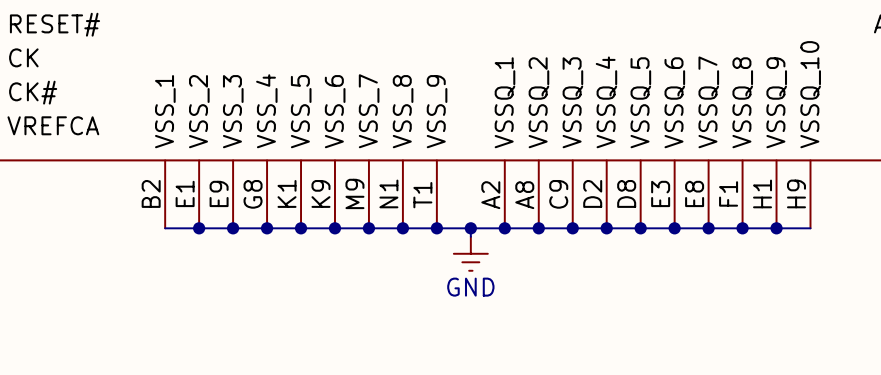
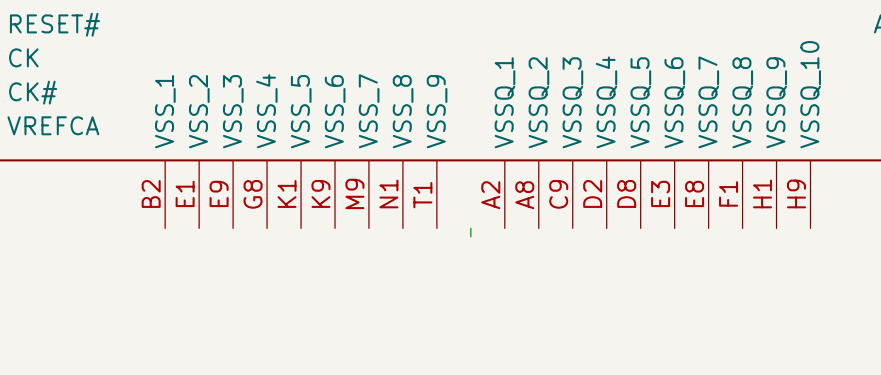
wire: (165, 228) (810, 228) -> none
junction: (199, 228) -> none
junction: (233, 228) -> none
junction: (267, 228) -> none
junction: (301, 228) -> none
junction: (334, 228) -> none
junction: (368, 228) -> none
junction: (402, 228) -> none
junction: (436, 228) -> none
junction: (470, 228) -> none
junction: (504, 228) -> none
junction: (538, 228) -> none
junction: (572, 228) -> none
junction: (606, 228) -> none
junction: (640, 228) -> none
junction: (674, 228) -> none
junction: (708, 228) -> none
junction: (742, 228) -> none
junction: (776, 228) -> none
power symbol: GND (470, 253) -> none

